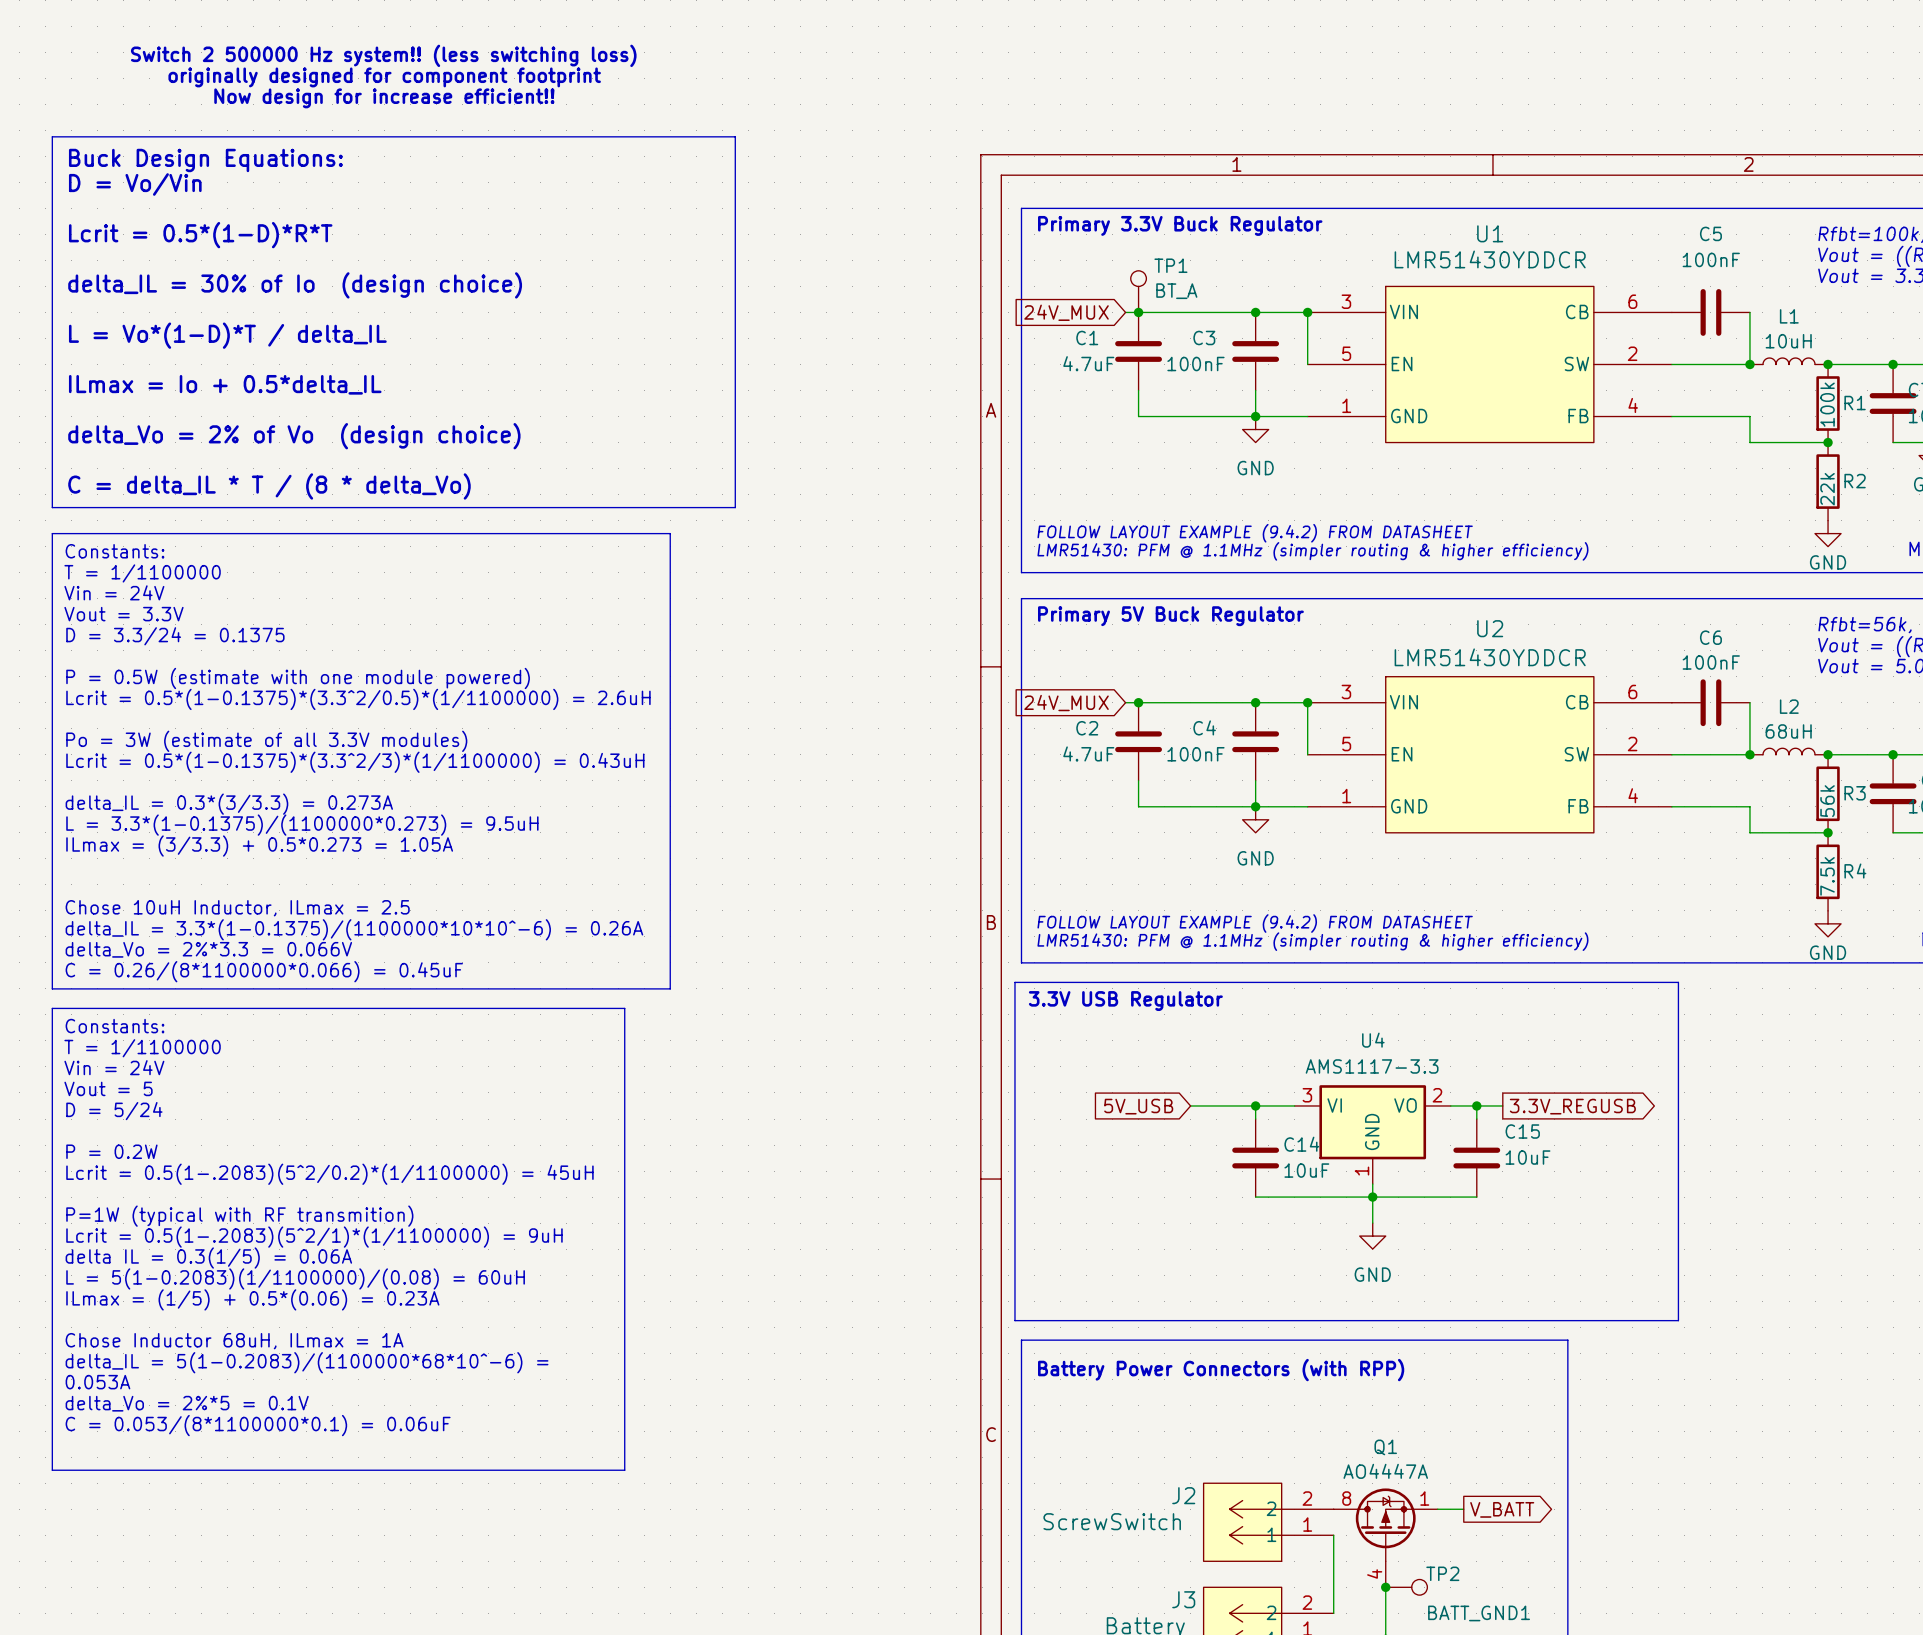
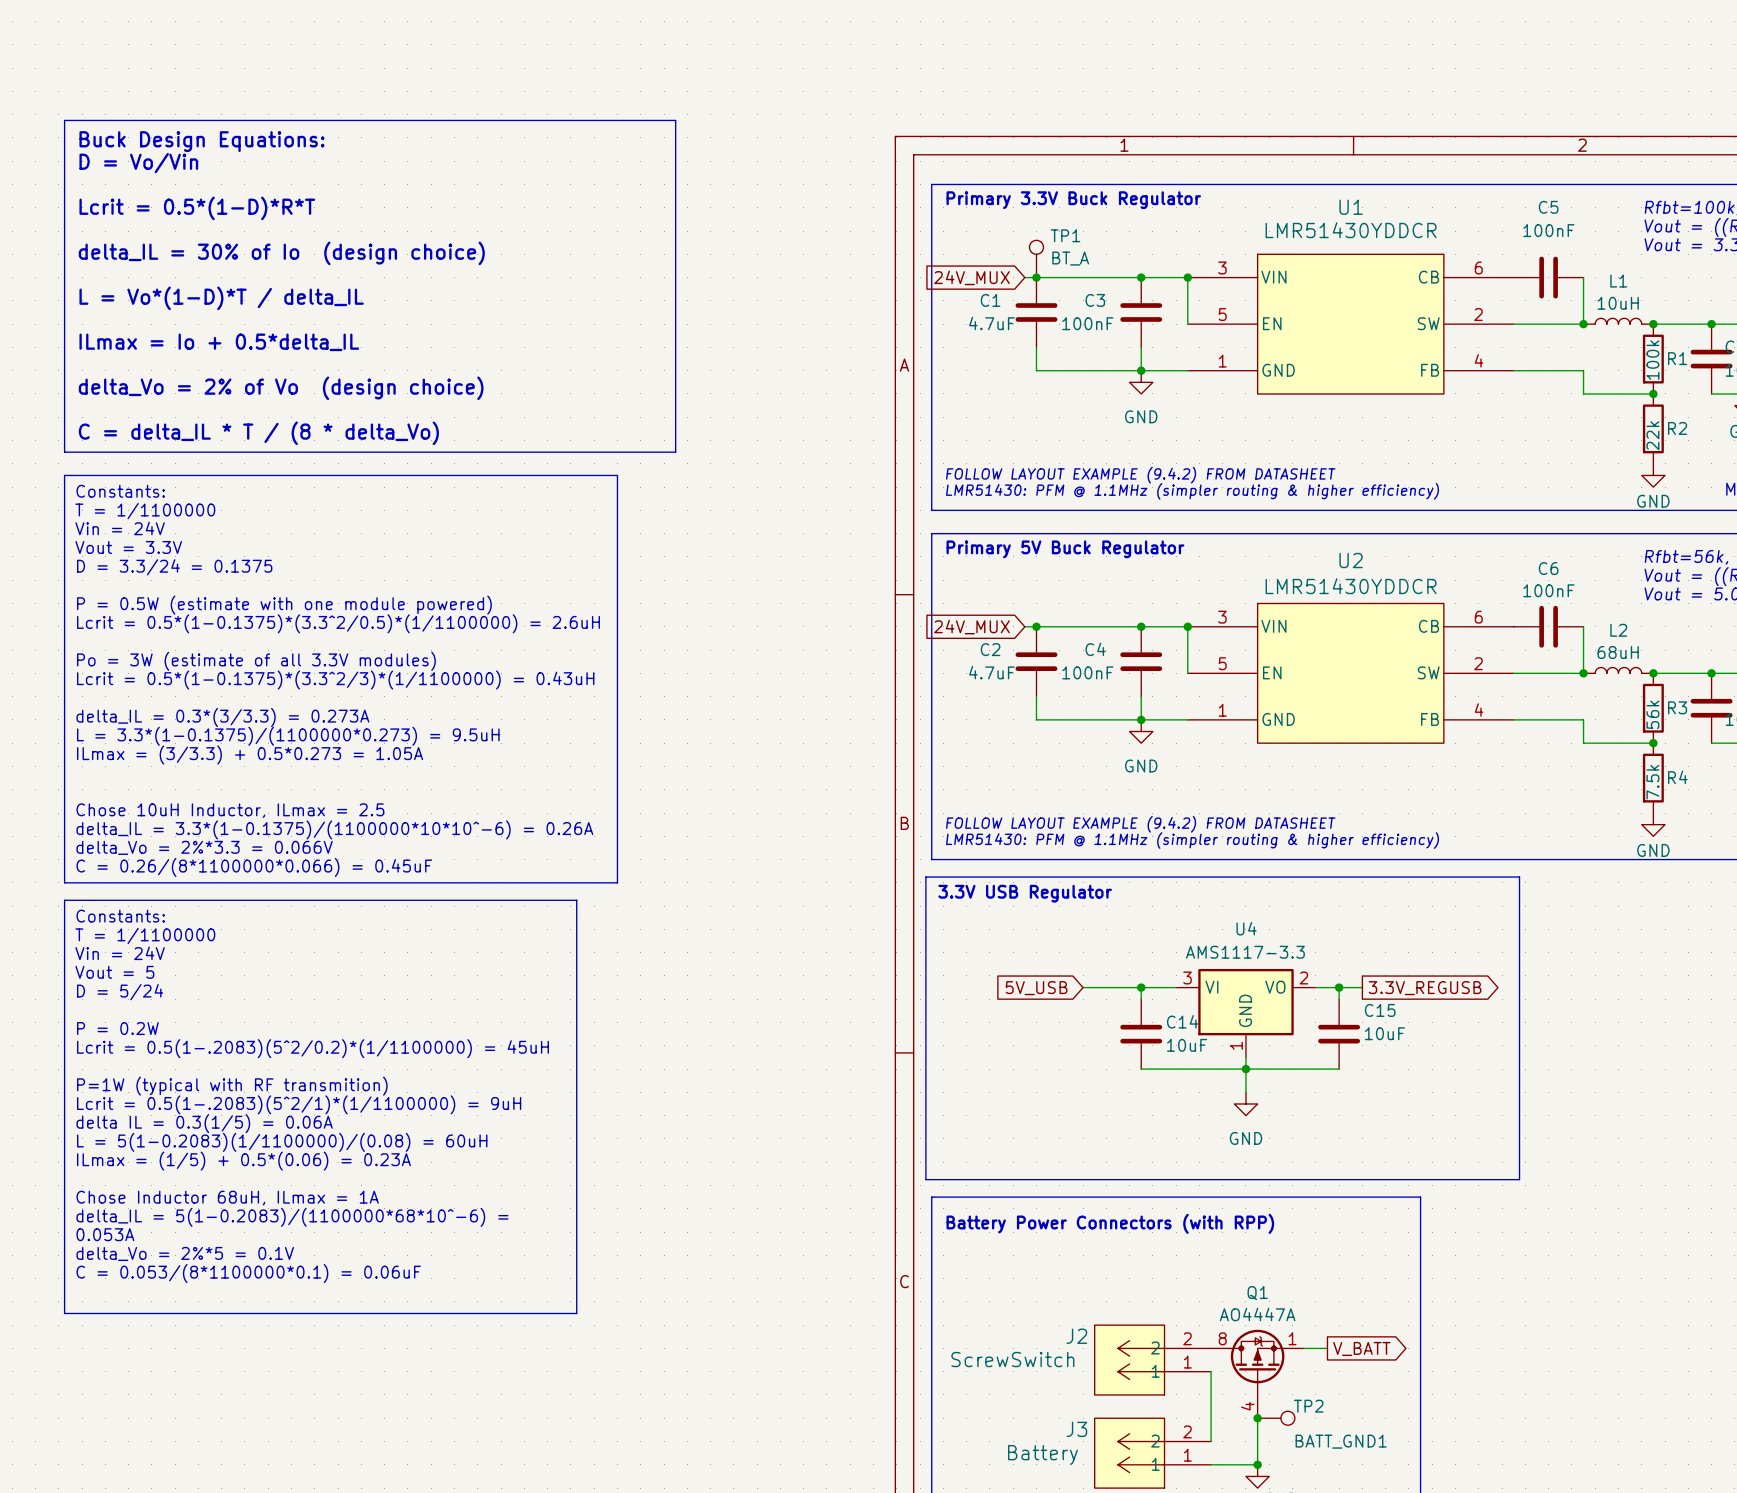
text: Switch 2 500000 Hz system!! (less switching loss) (383, 55) -> none
text: originally designed for component footprint (384, 77) -> none
text: Now design for increase efficient!! (384, 98) -> none

